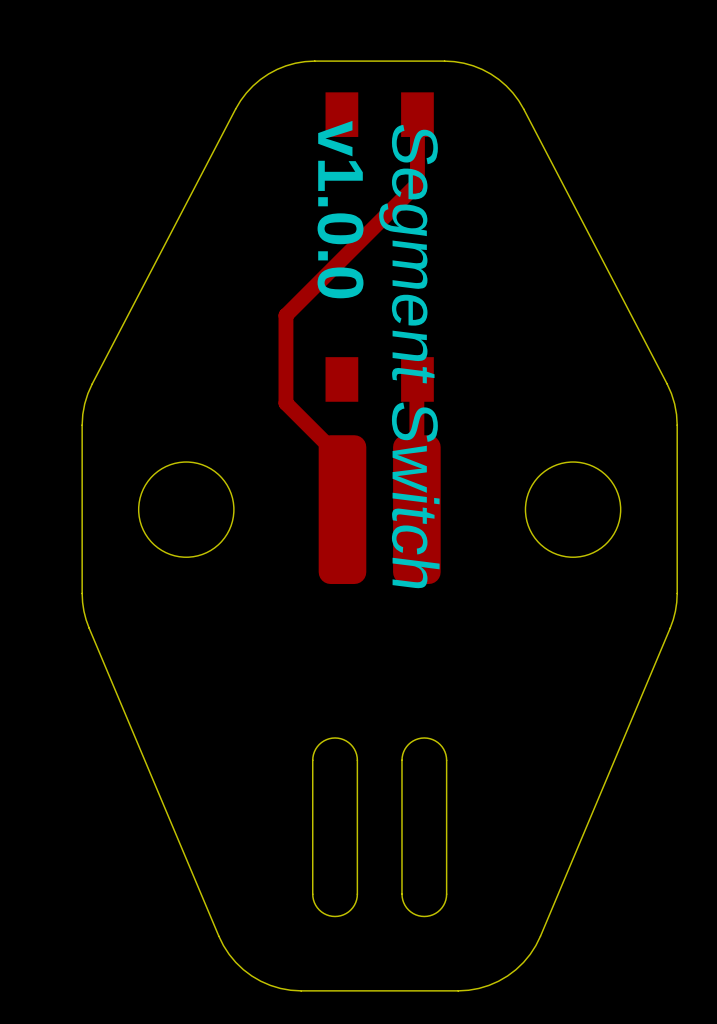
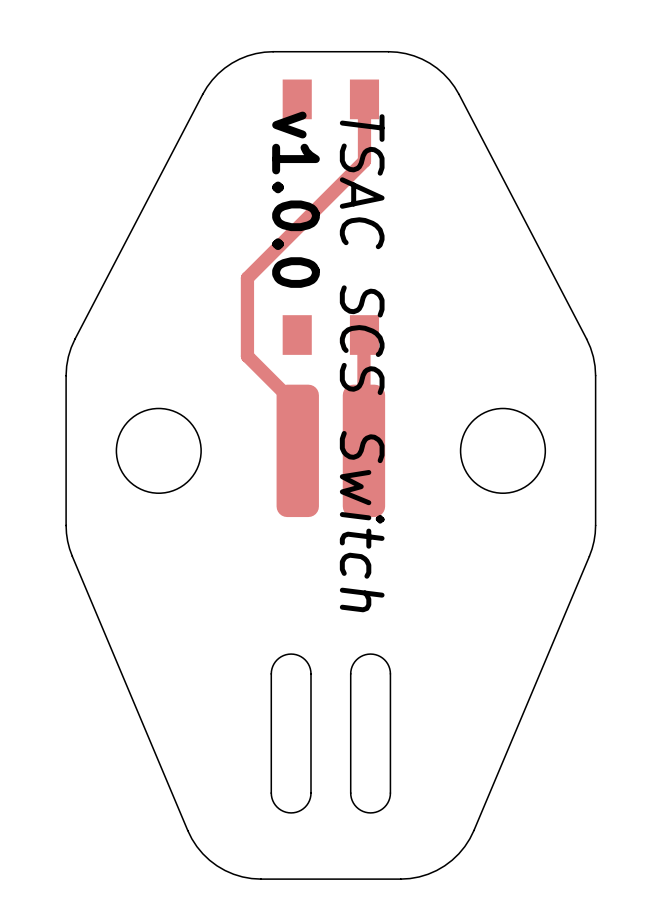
text: Segment Switch (409, 356) -> TSAC SCS Switch (362, 363)

